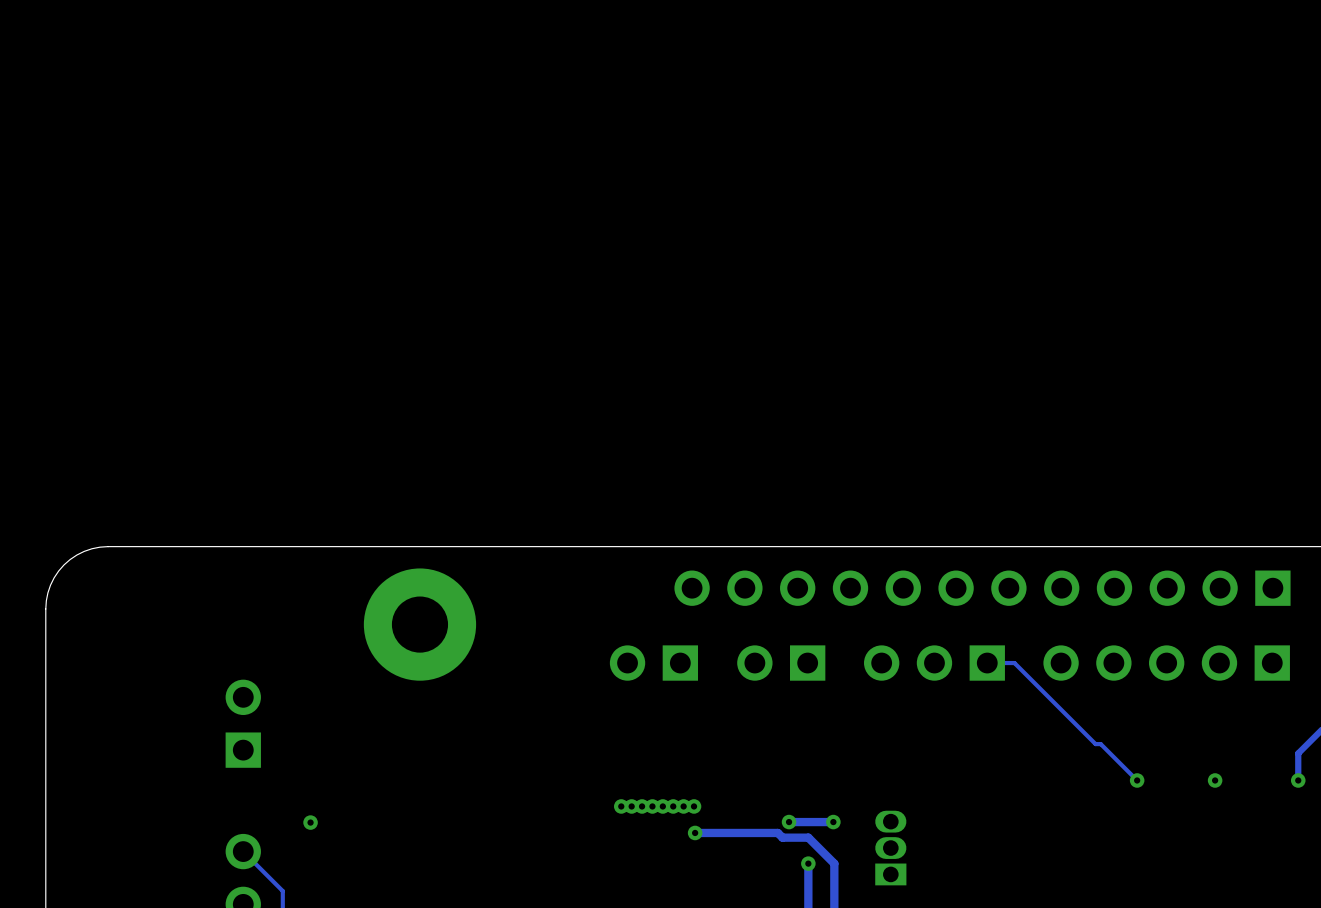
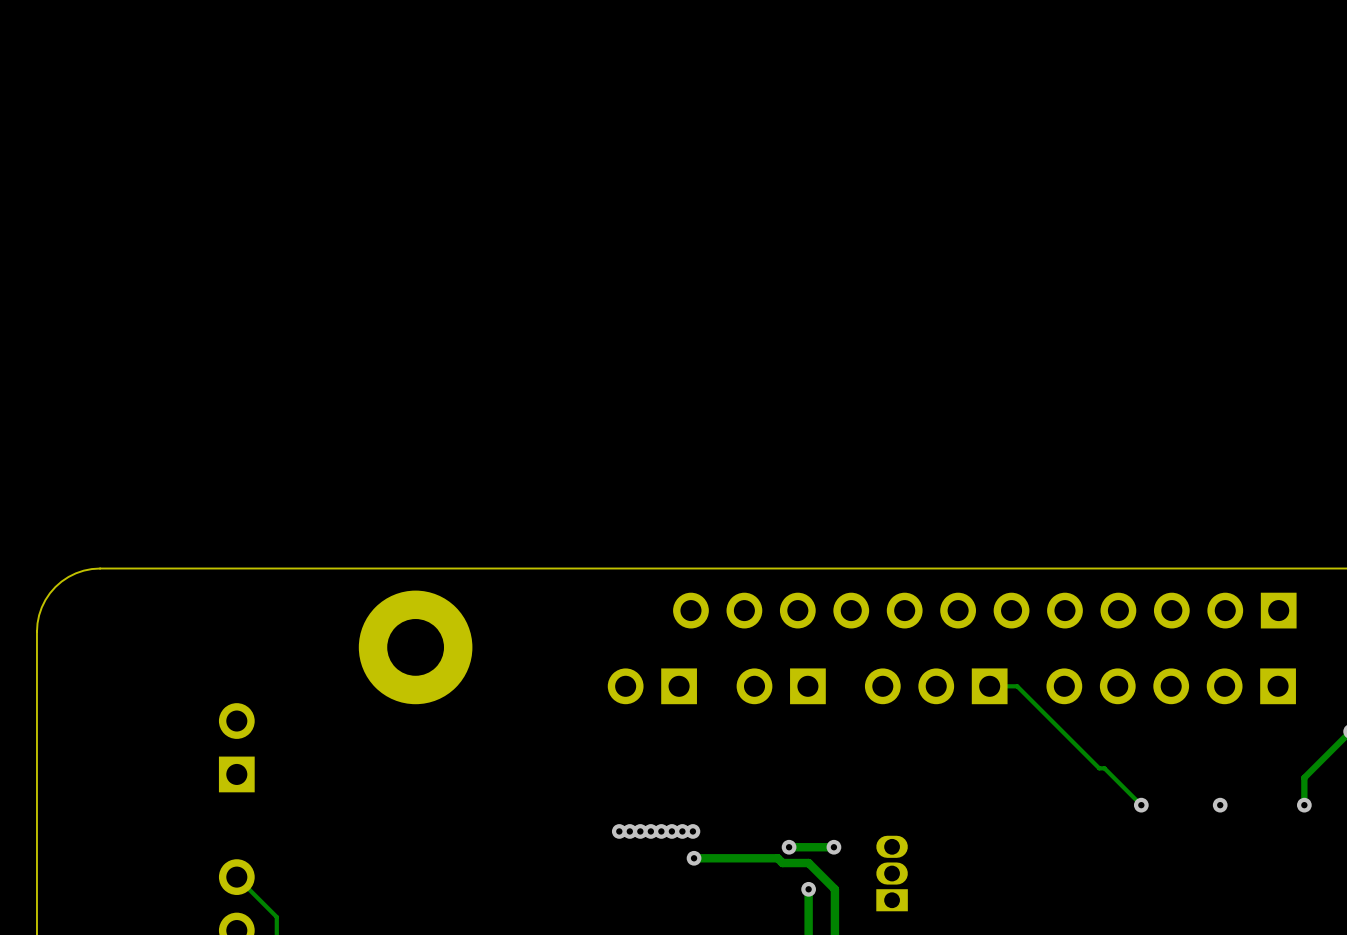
via: (310, 822) -> none

